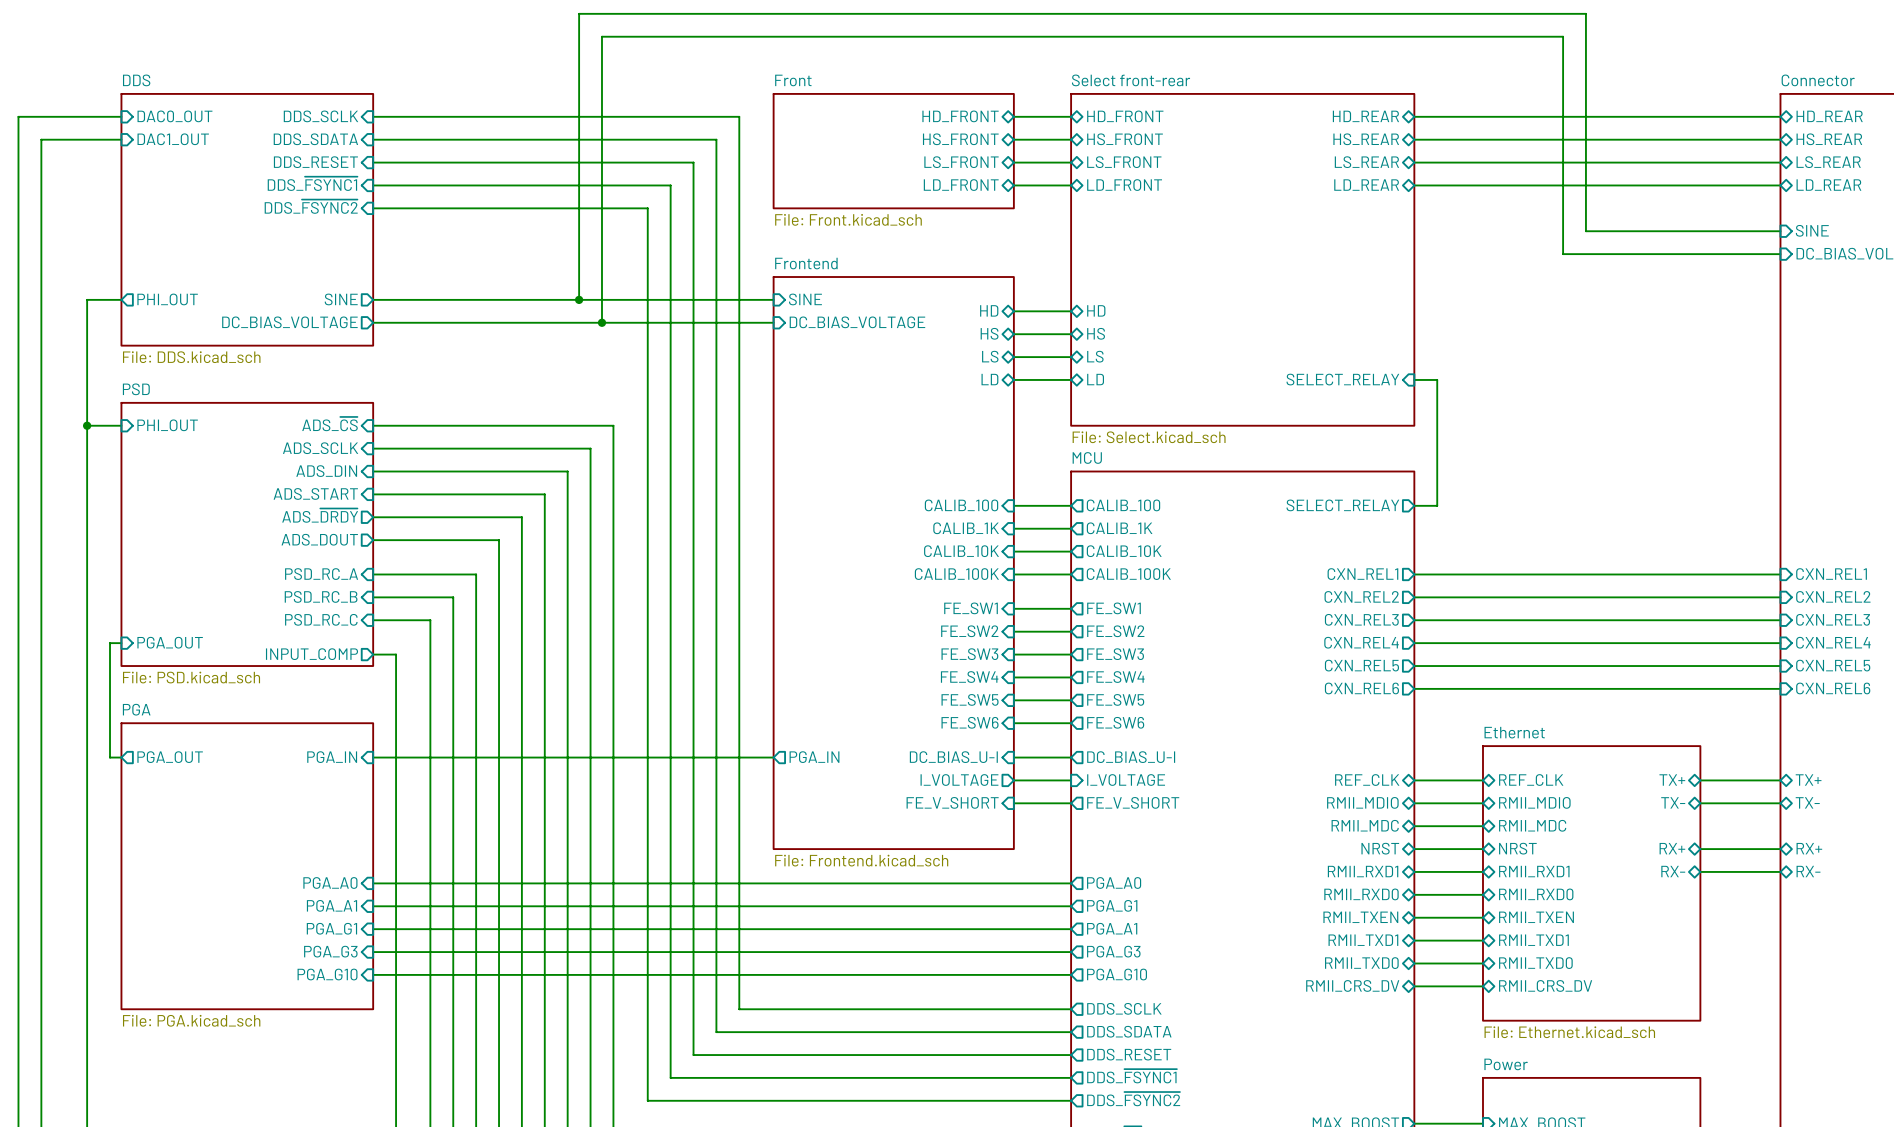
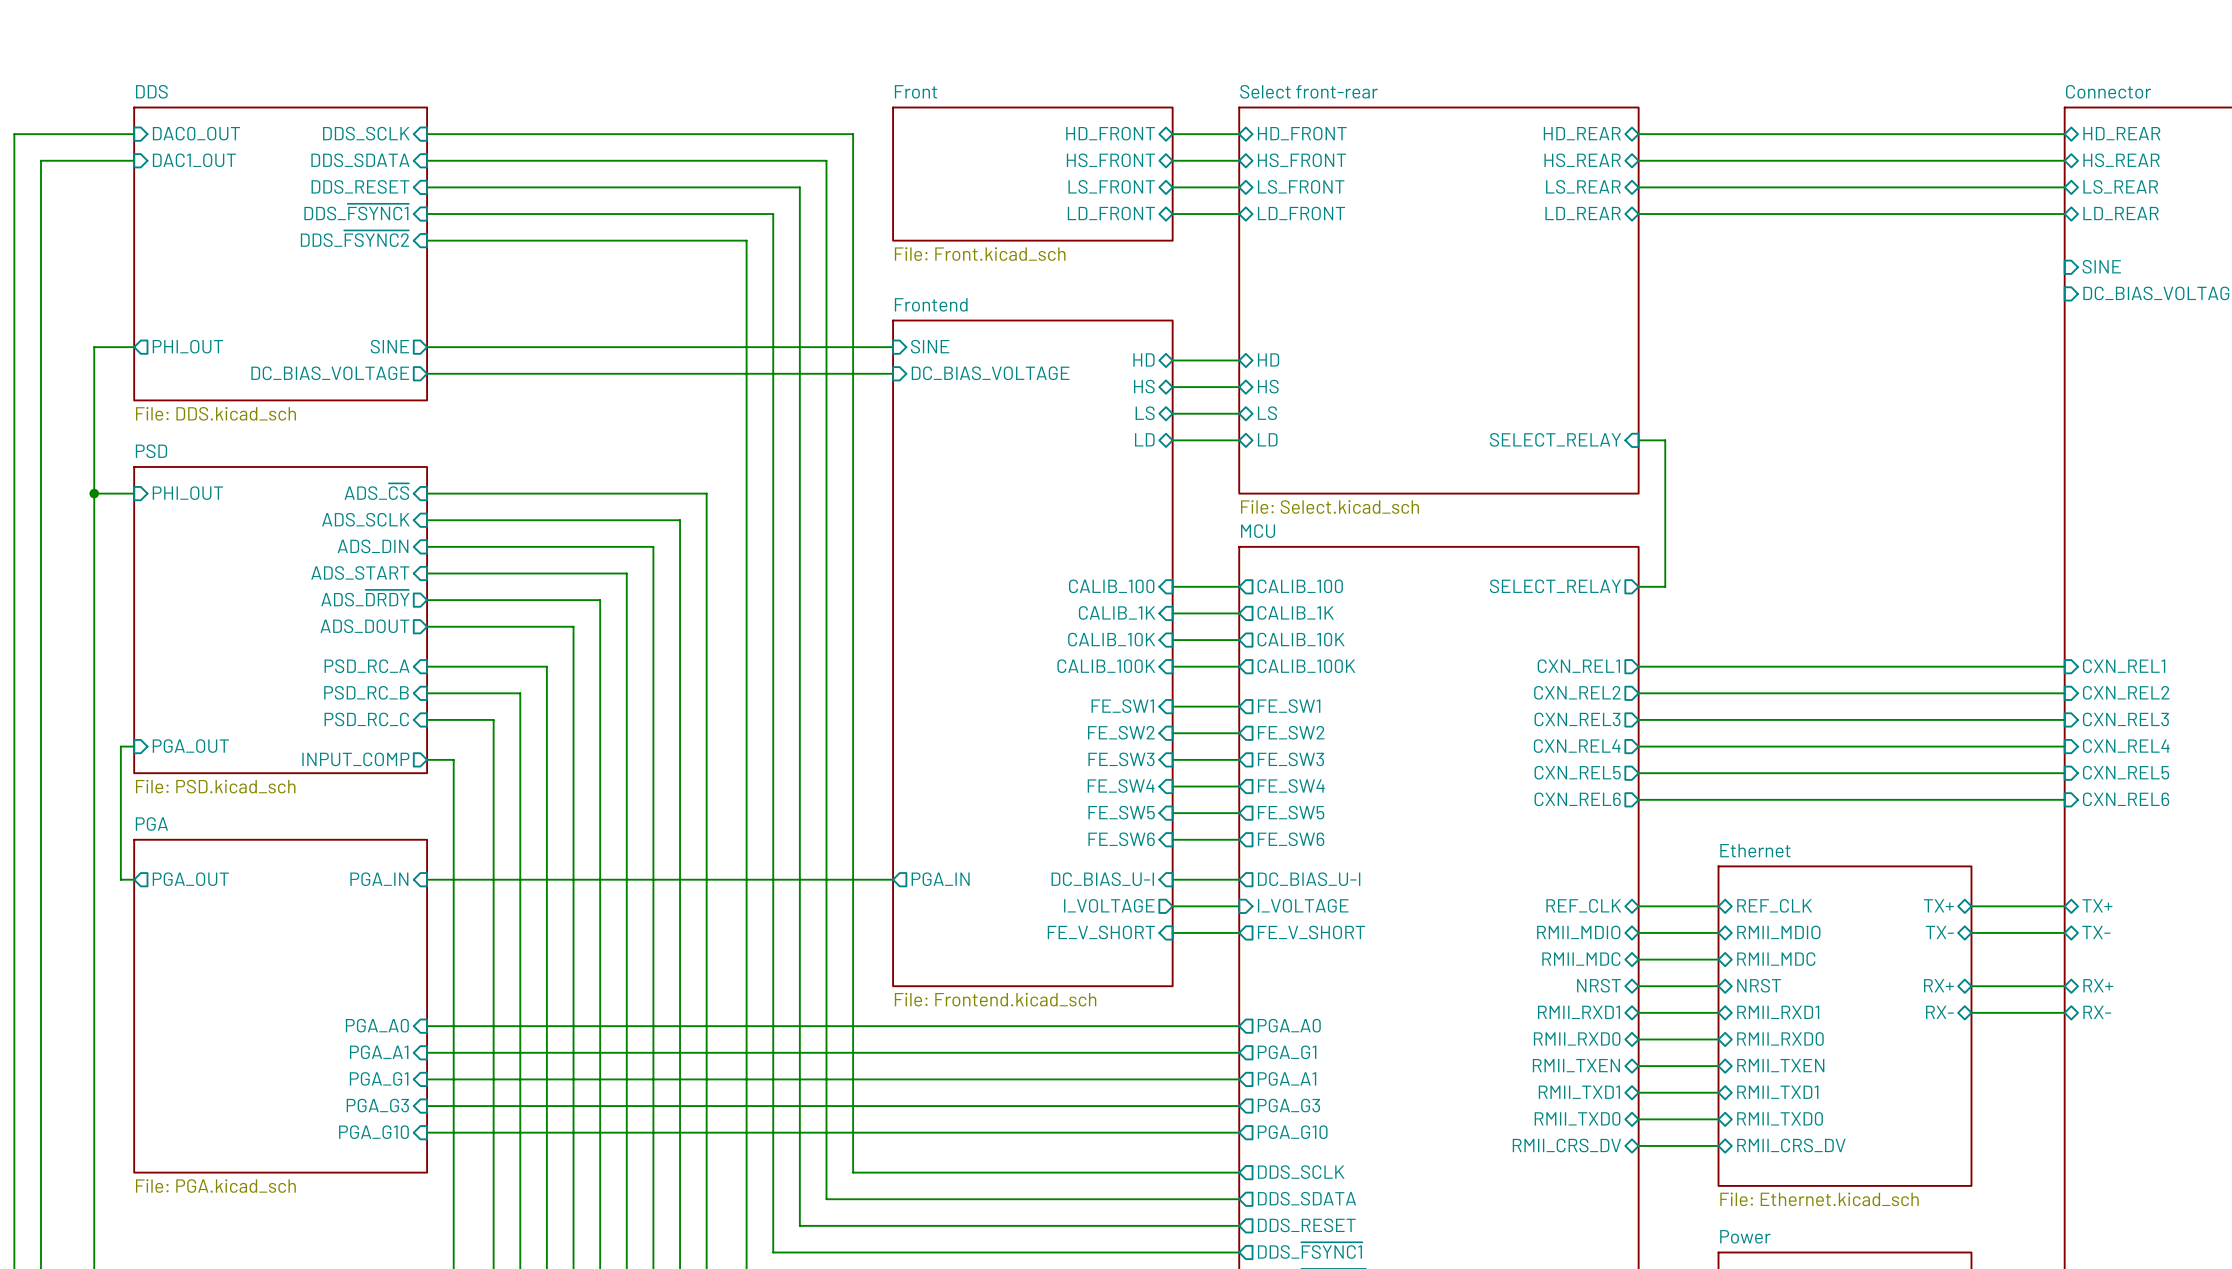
wire: (1780, 231) (1585, 231) (1585, 13) (579, 13) (579, 299) -> none
wire: (1780, 254) (1563, 254) (1563, 36) (601, 36) (601, 322) -> none
junction: (579, 299) -> none
junction: (601, 322) -> none

